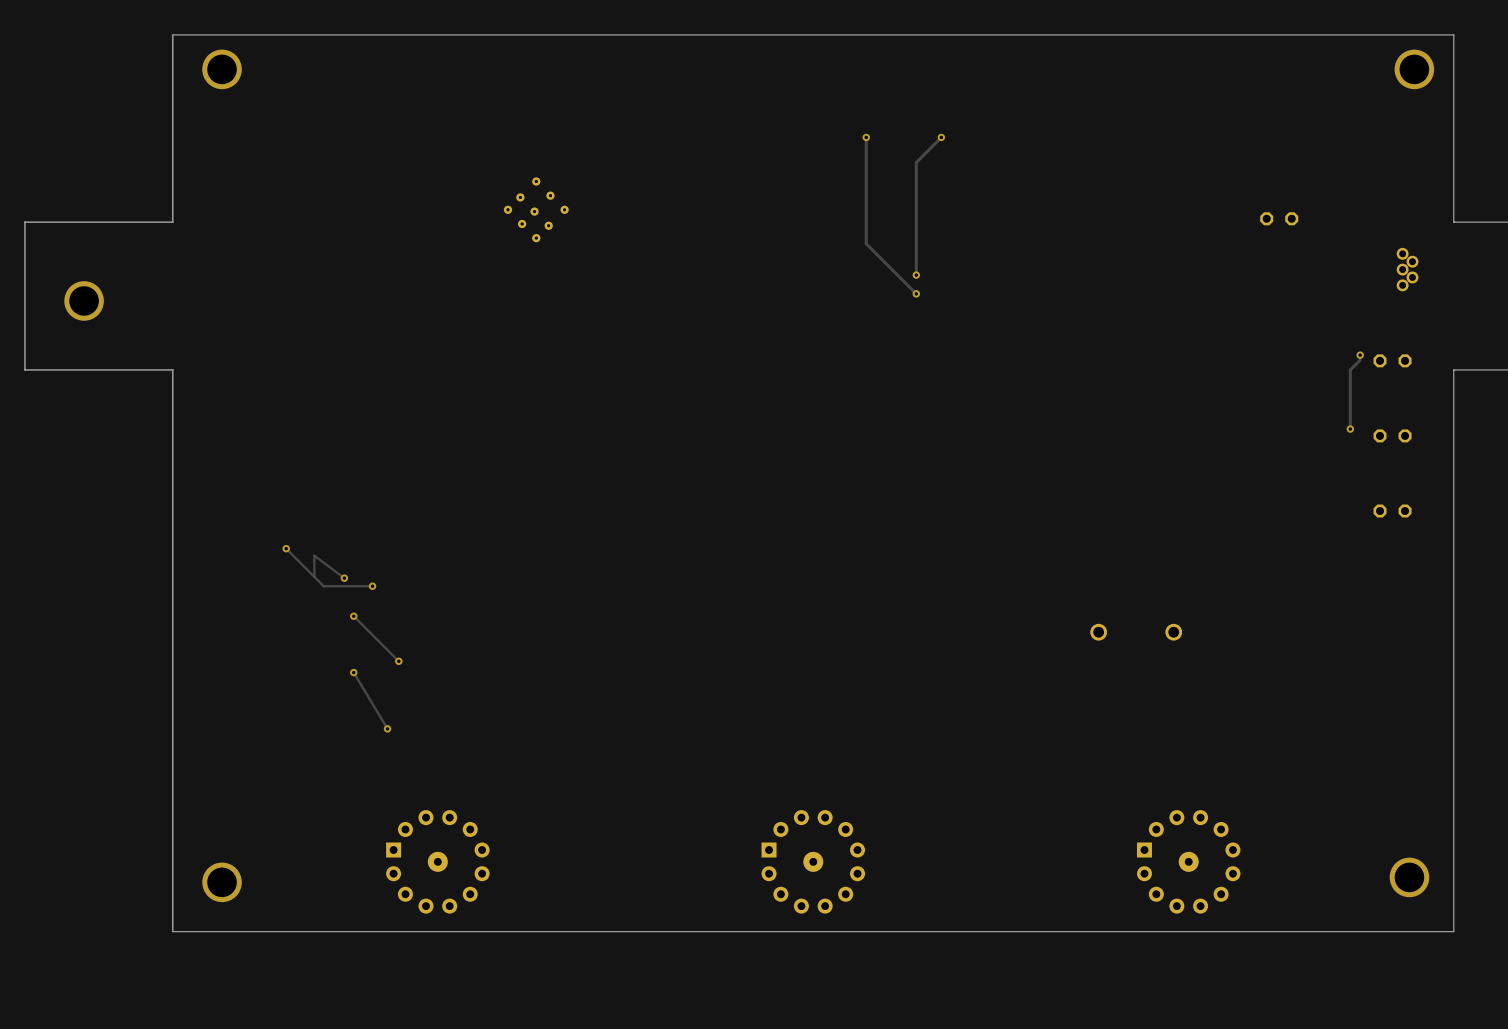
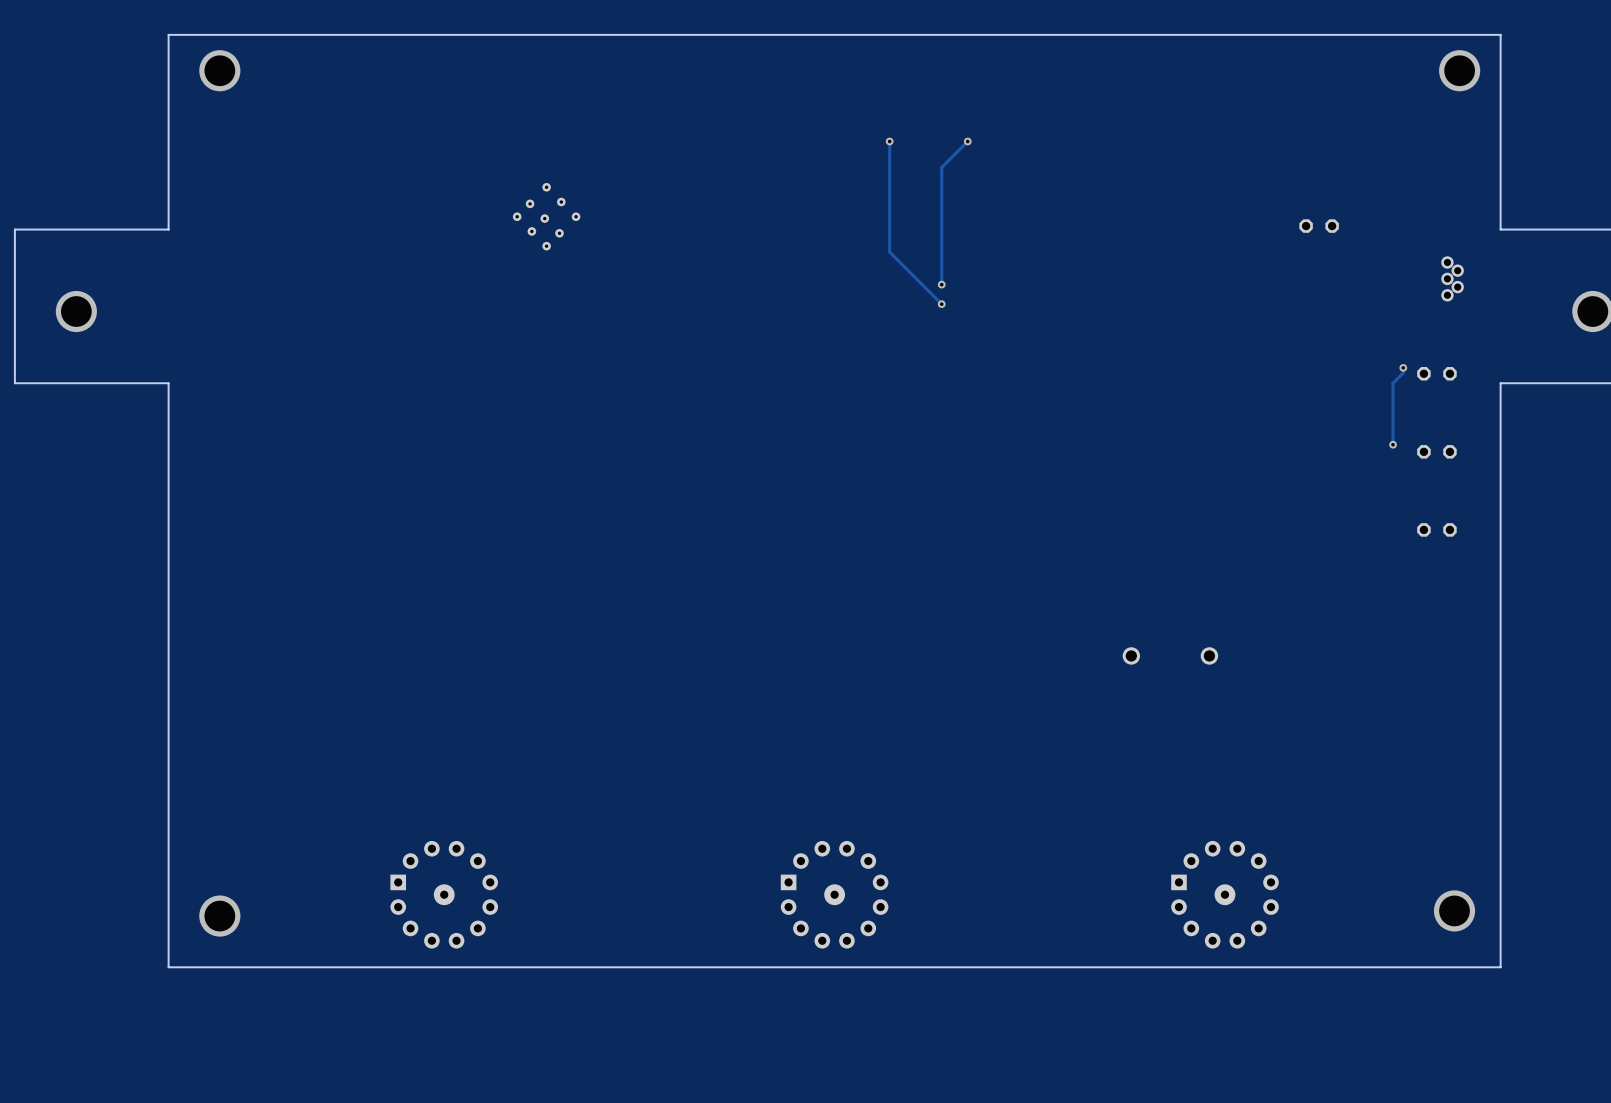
track: (286, 548) (323, 586) (372, 586) -> none
via: (286, 548) -> none
track: (314, 576) (314, 555) (344, 578) -> none
via: (344, 578) -> none
via: (372, 586) -> none
track: (353, 616) (398, 661) -> none
via: (353, 616) -> none
via: (398, 661) -> none
track: (353, 672) (387, 728) -> none
via: (353, 672) -> none
via: (387, 728) -> none

